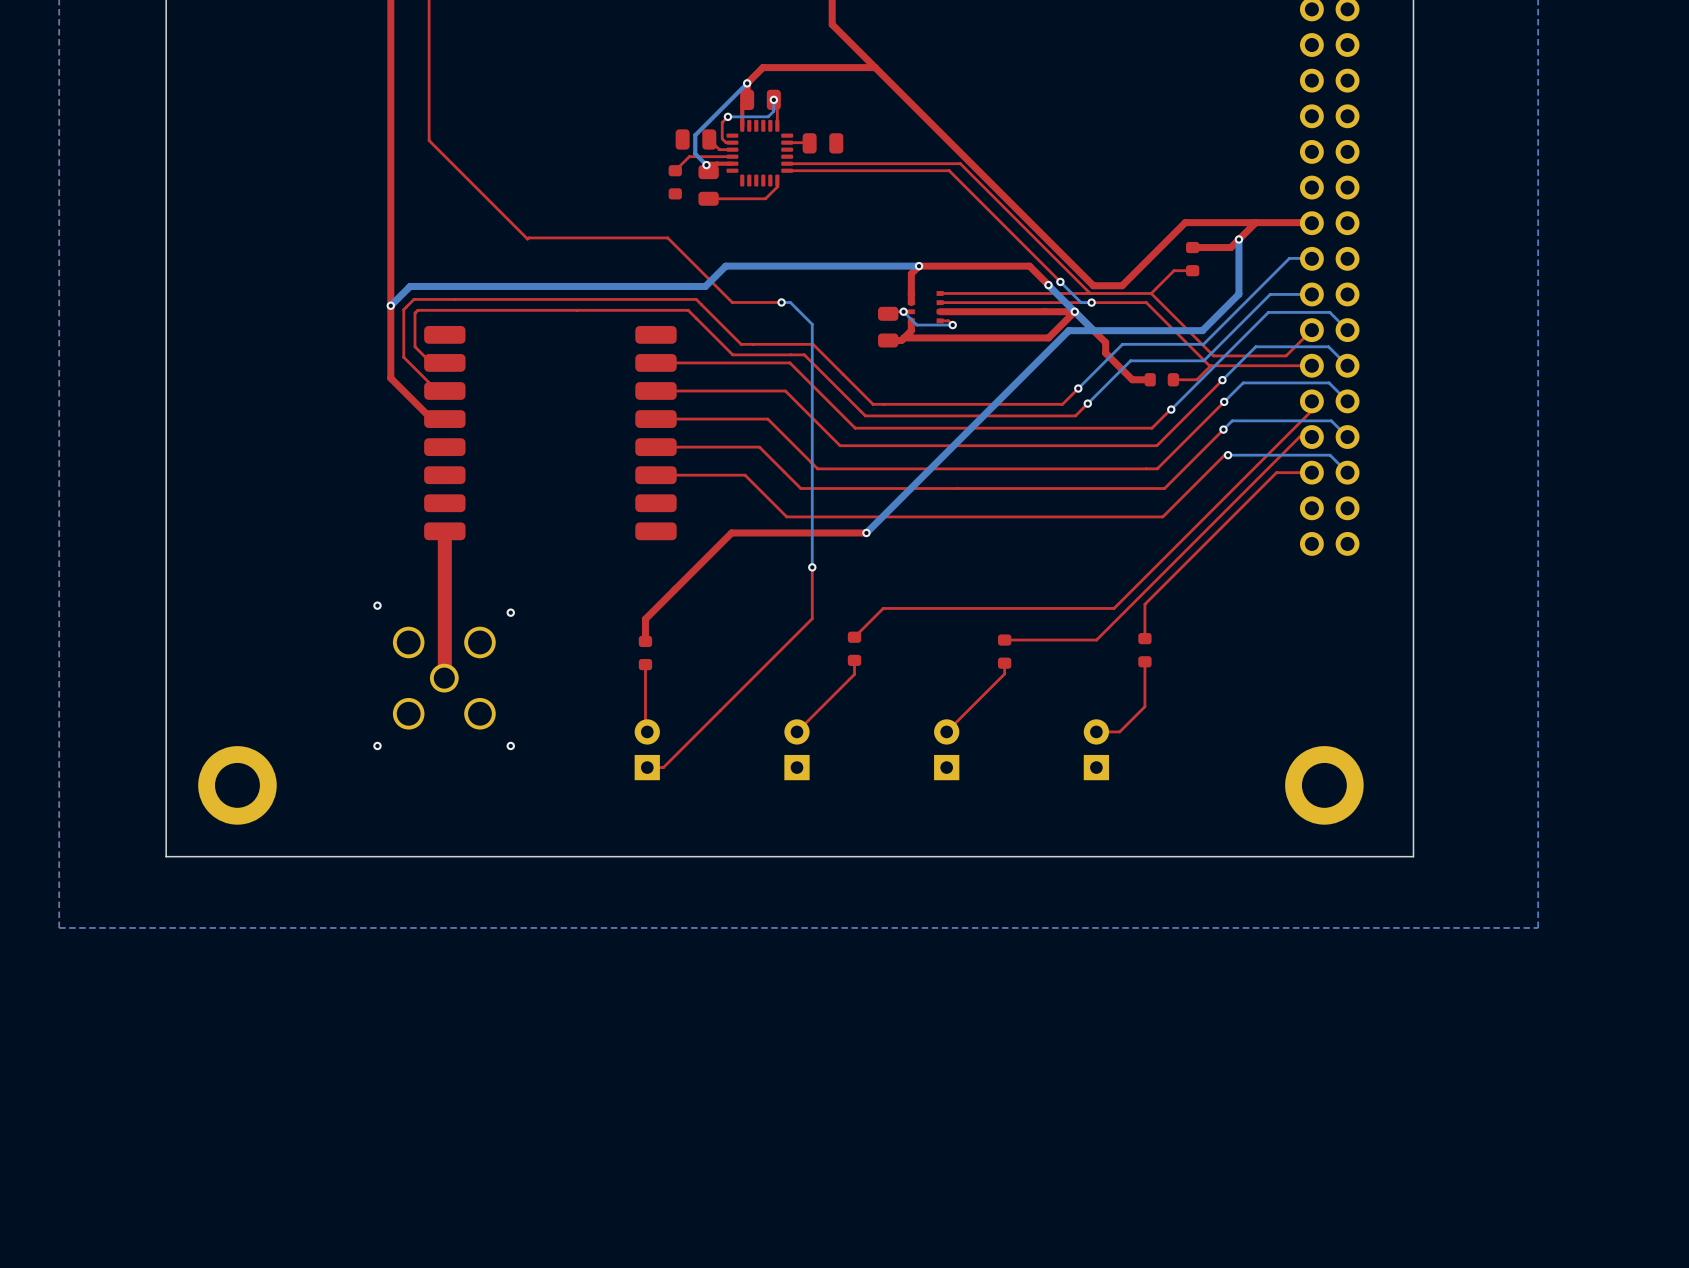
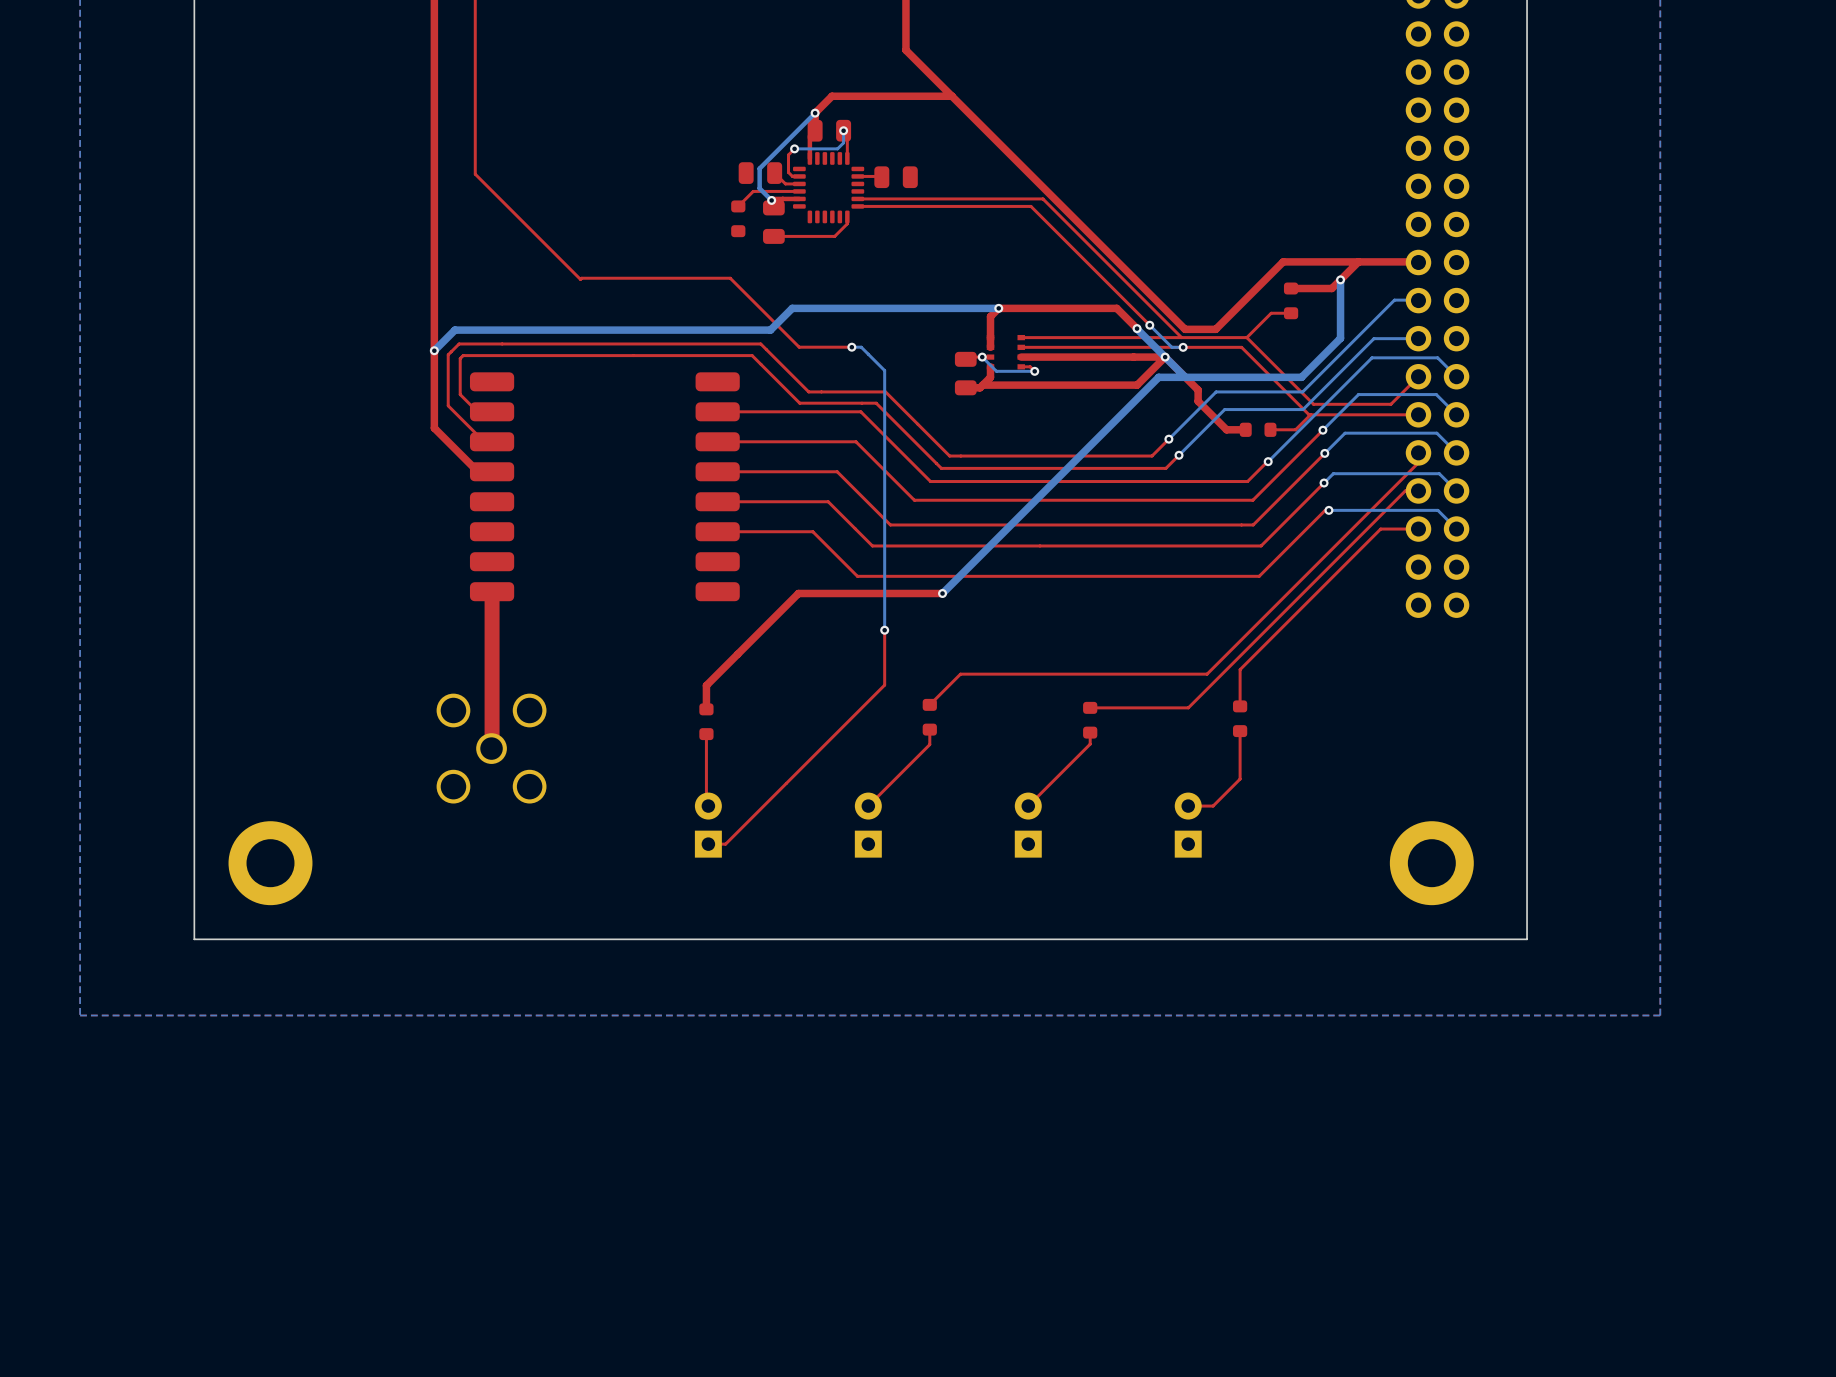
via: (377, 605) -> none
via: (510, 612) -> none
via: (377, 745) -> none
via: (510, 745) -> none

